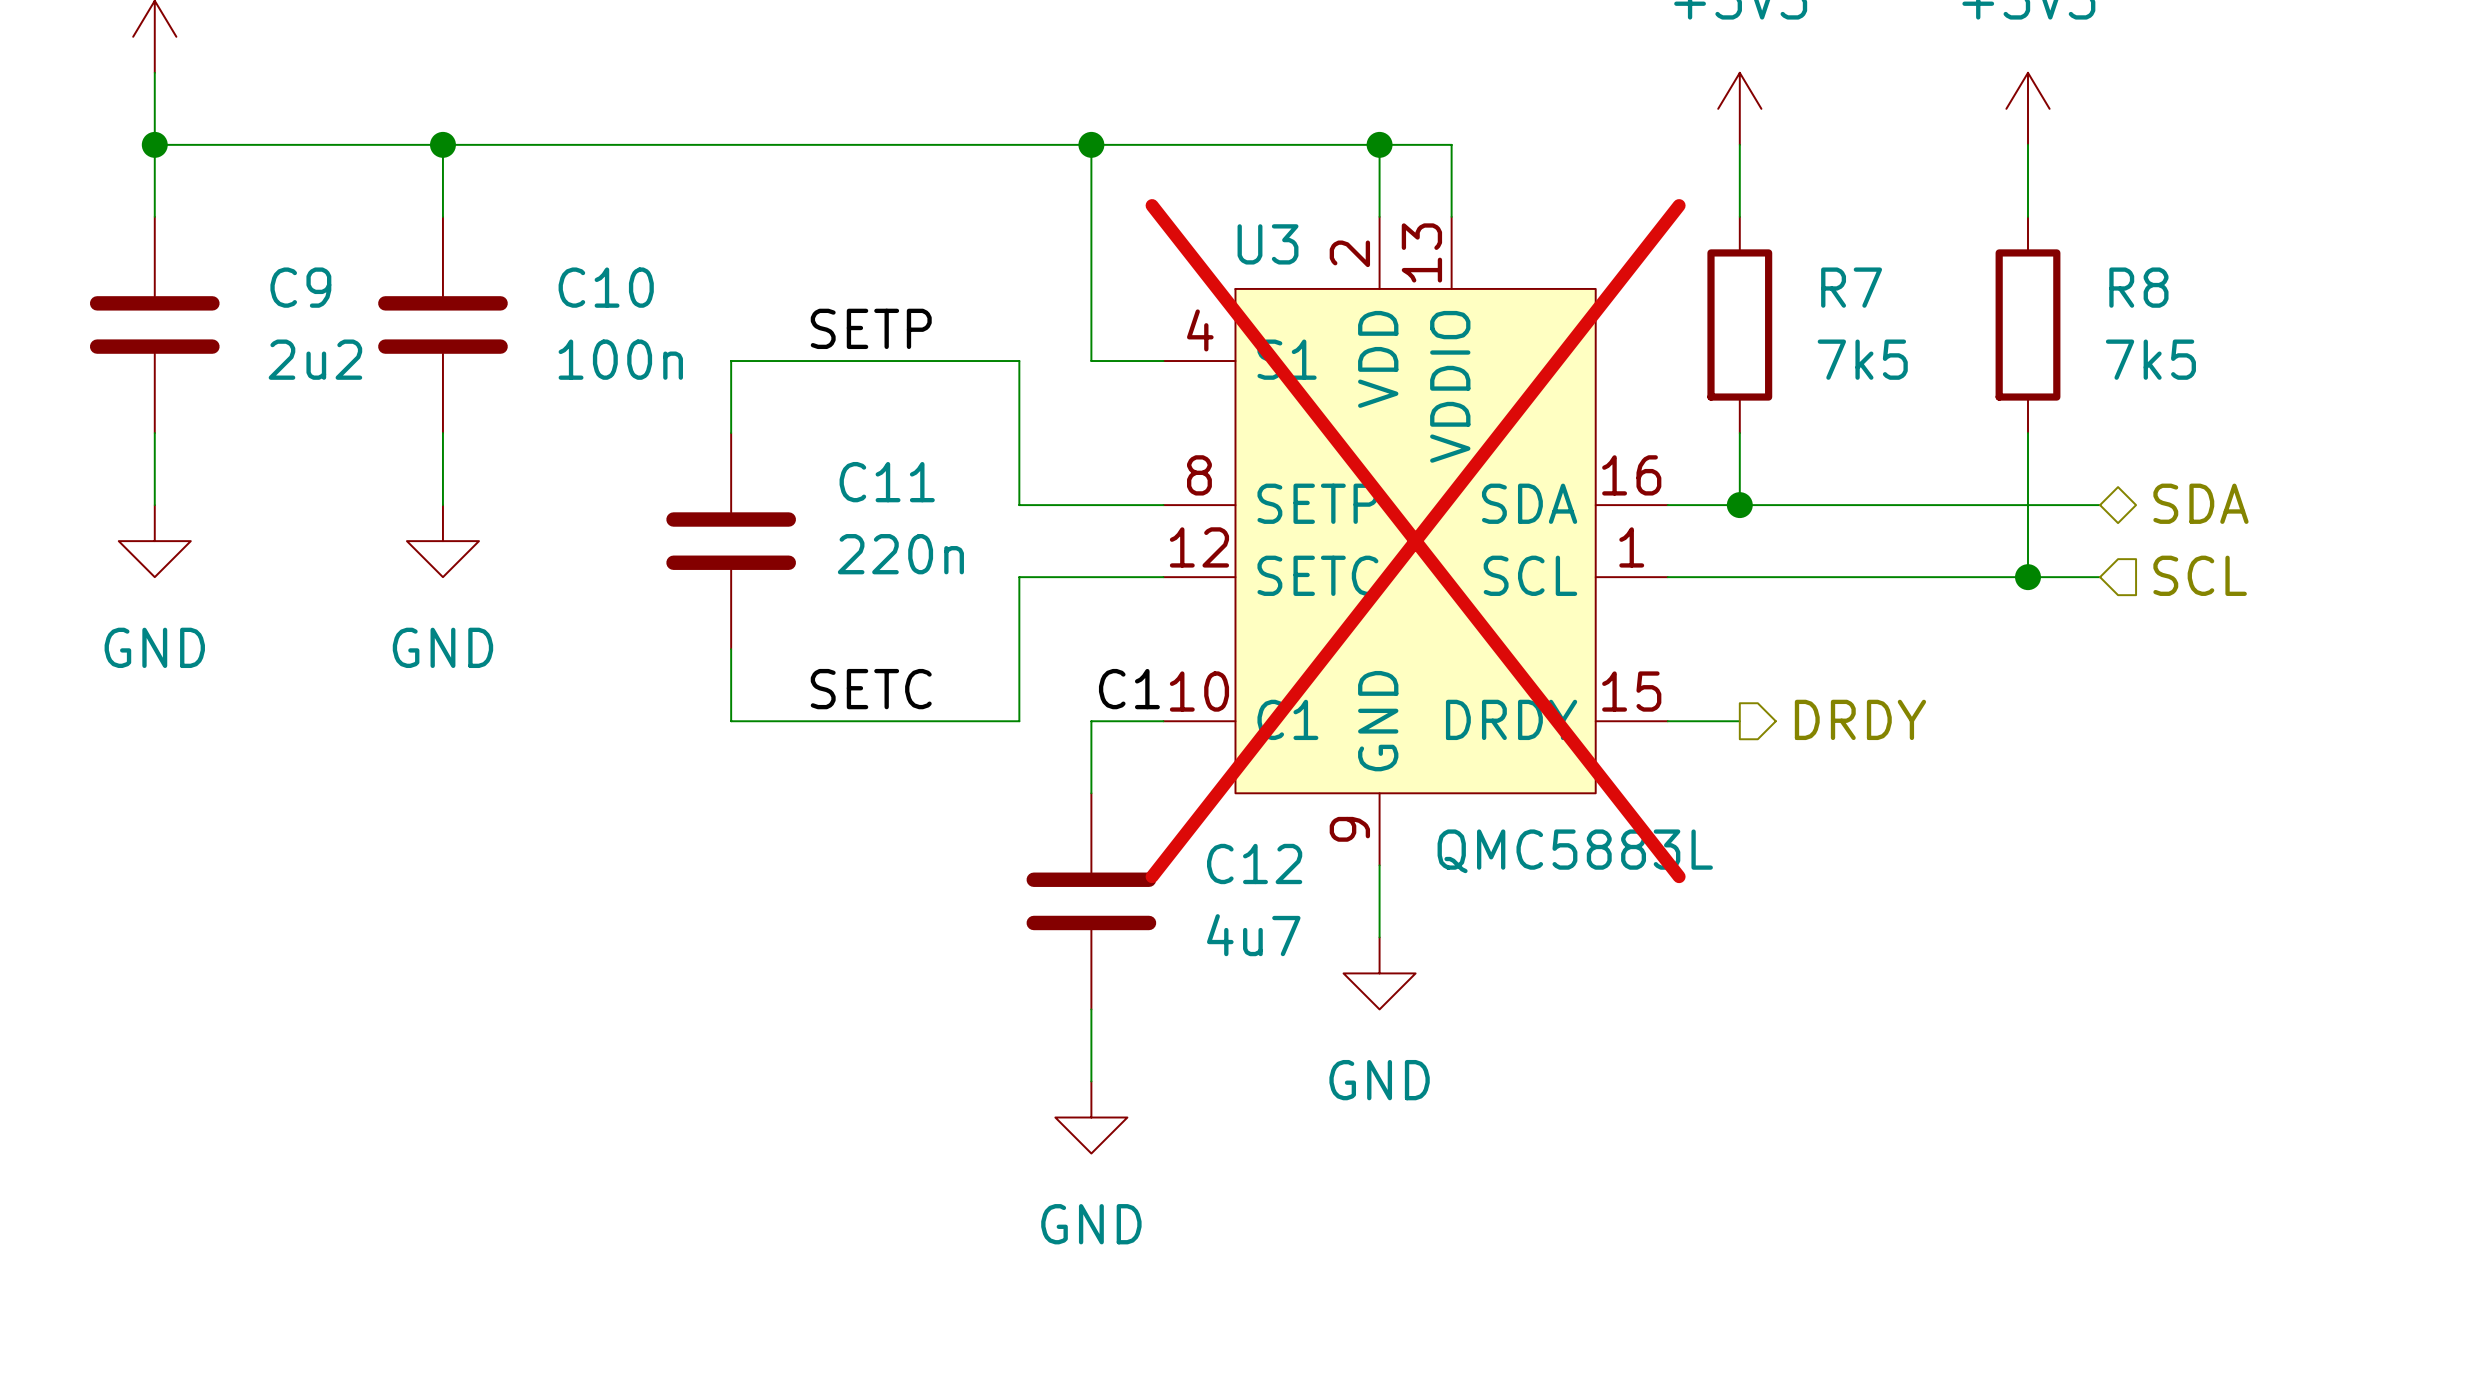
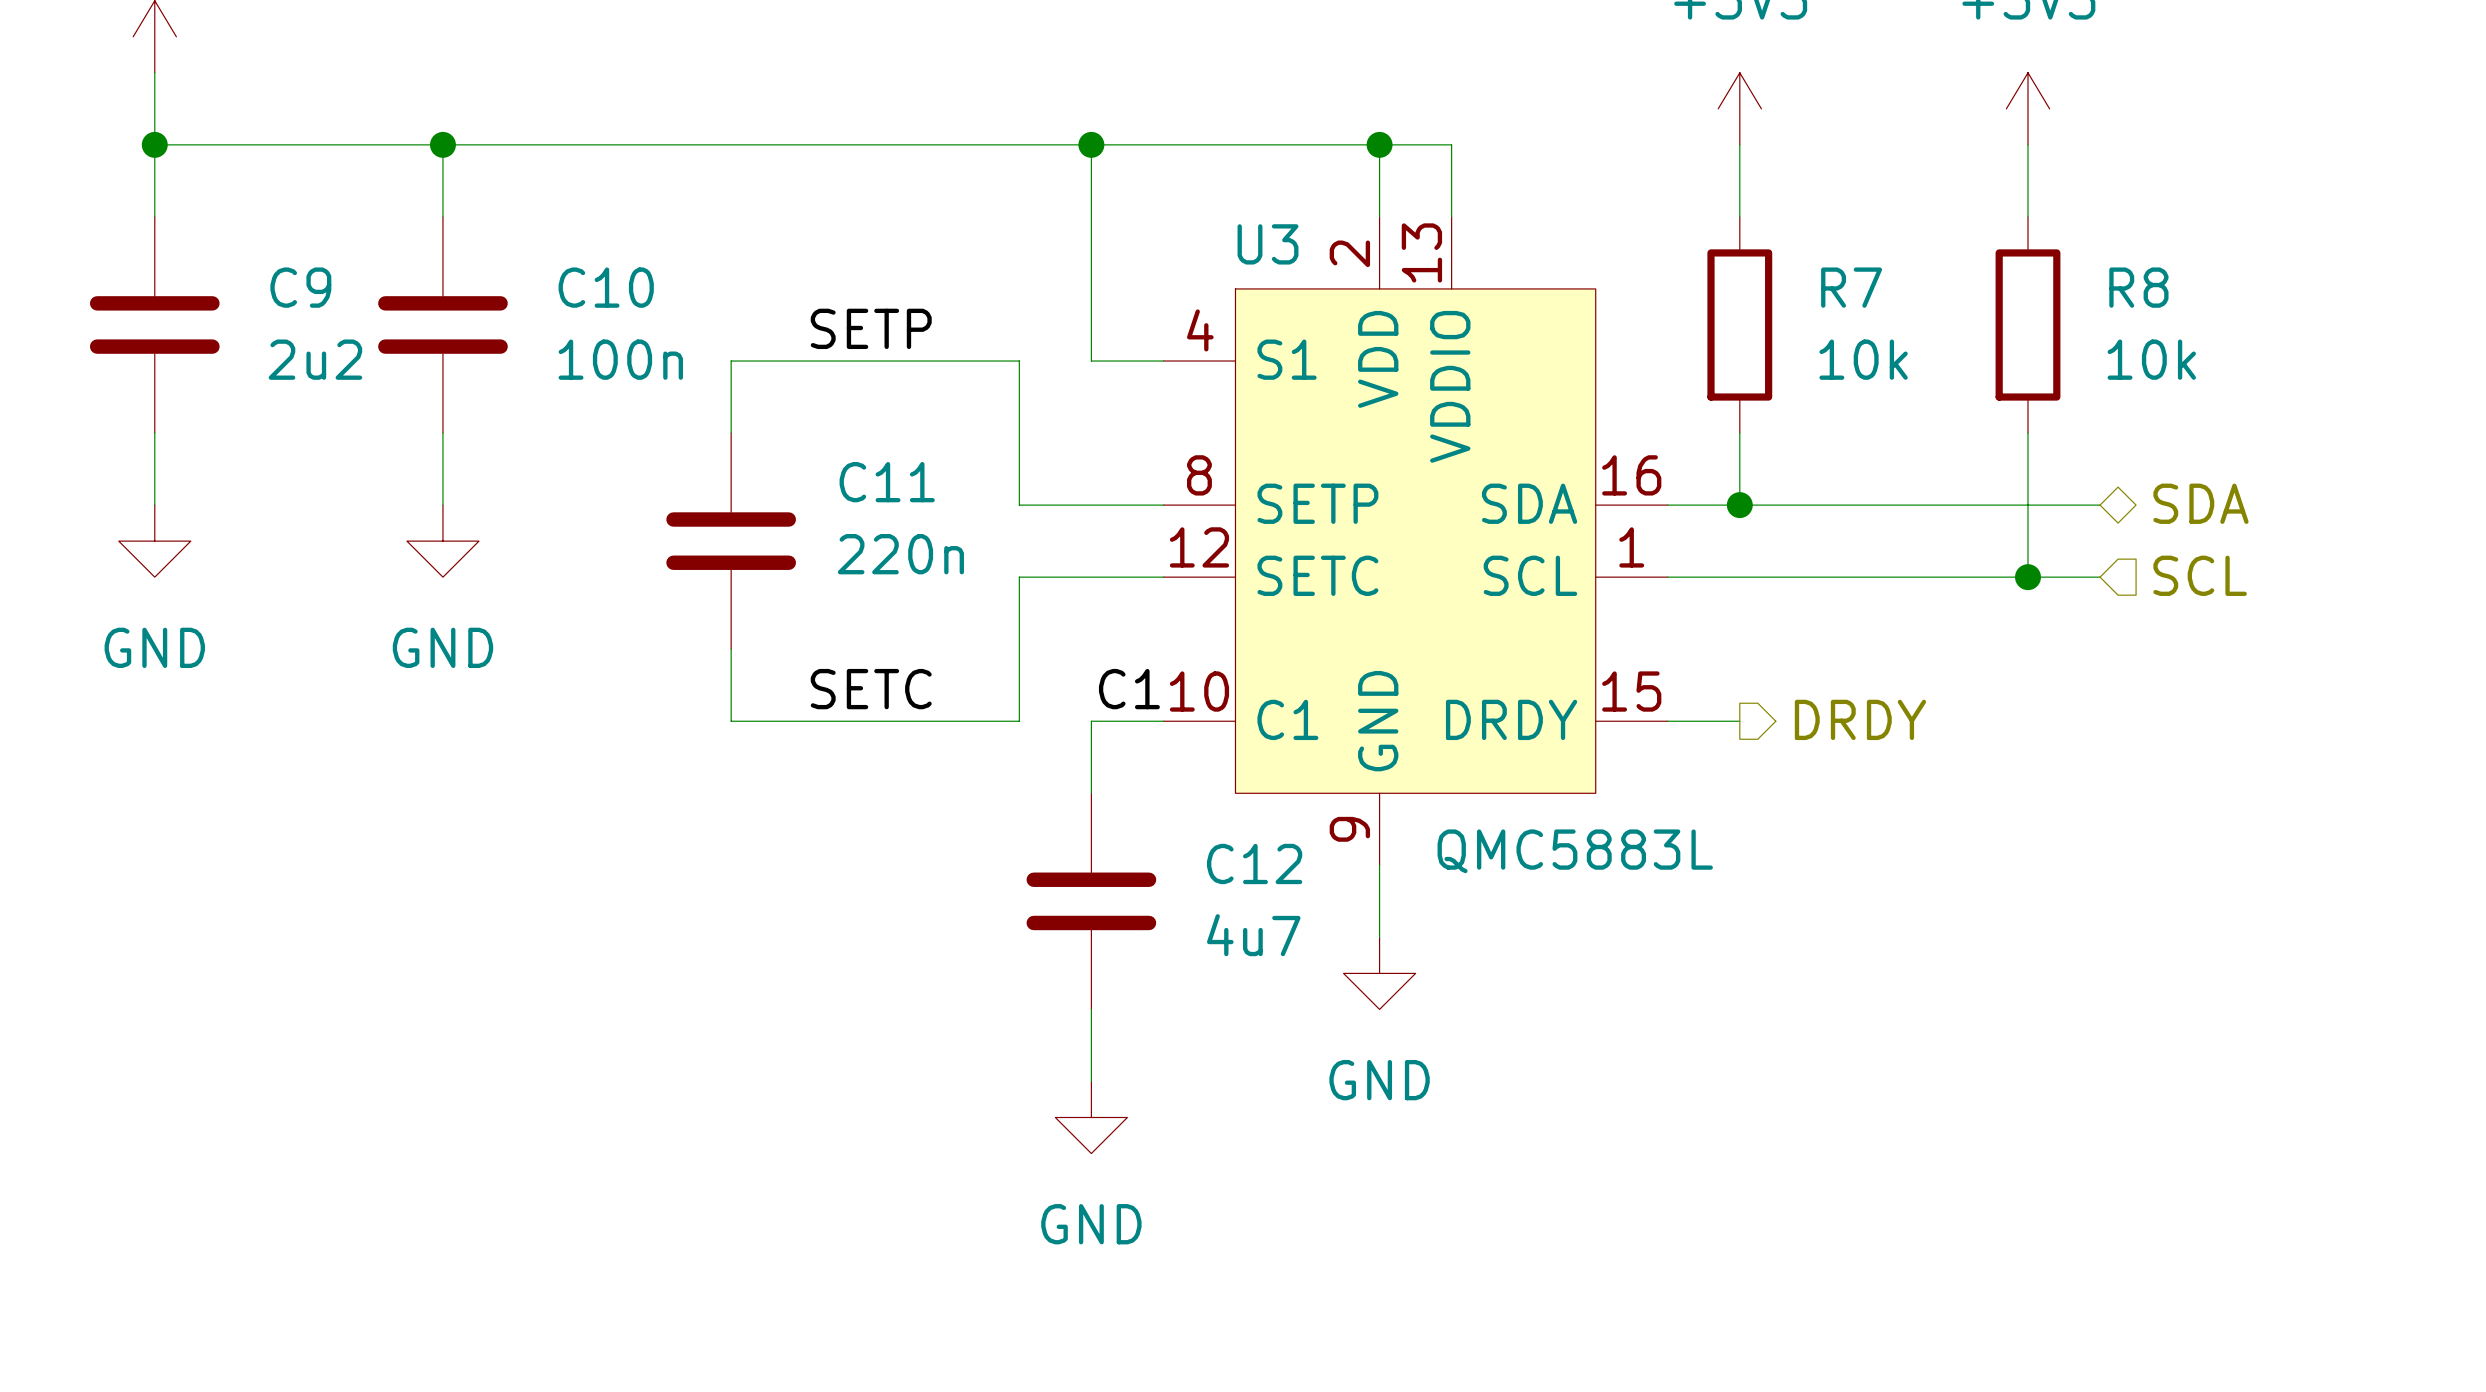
R7 value: 7k5 (1862, 359) -> 10k (1863, 359)
R8 value: 7k5 (2150, 359) -> 10k (2151, 359)
U3 do-not-place cross: (1415, 541) -> none

